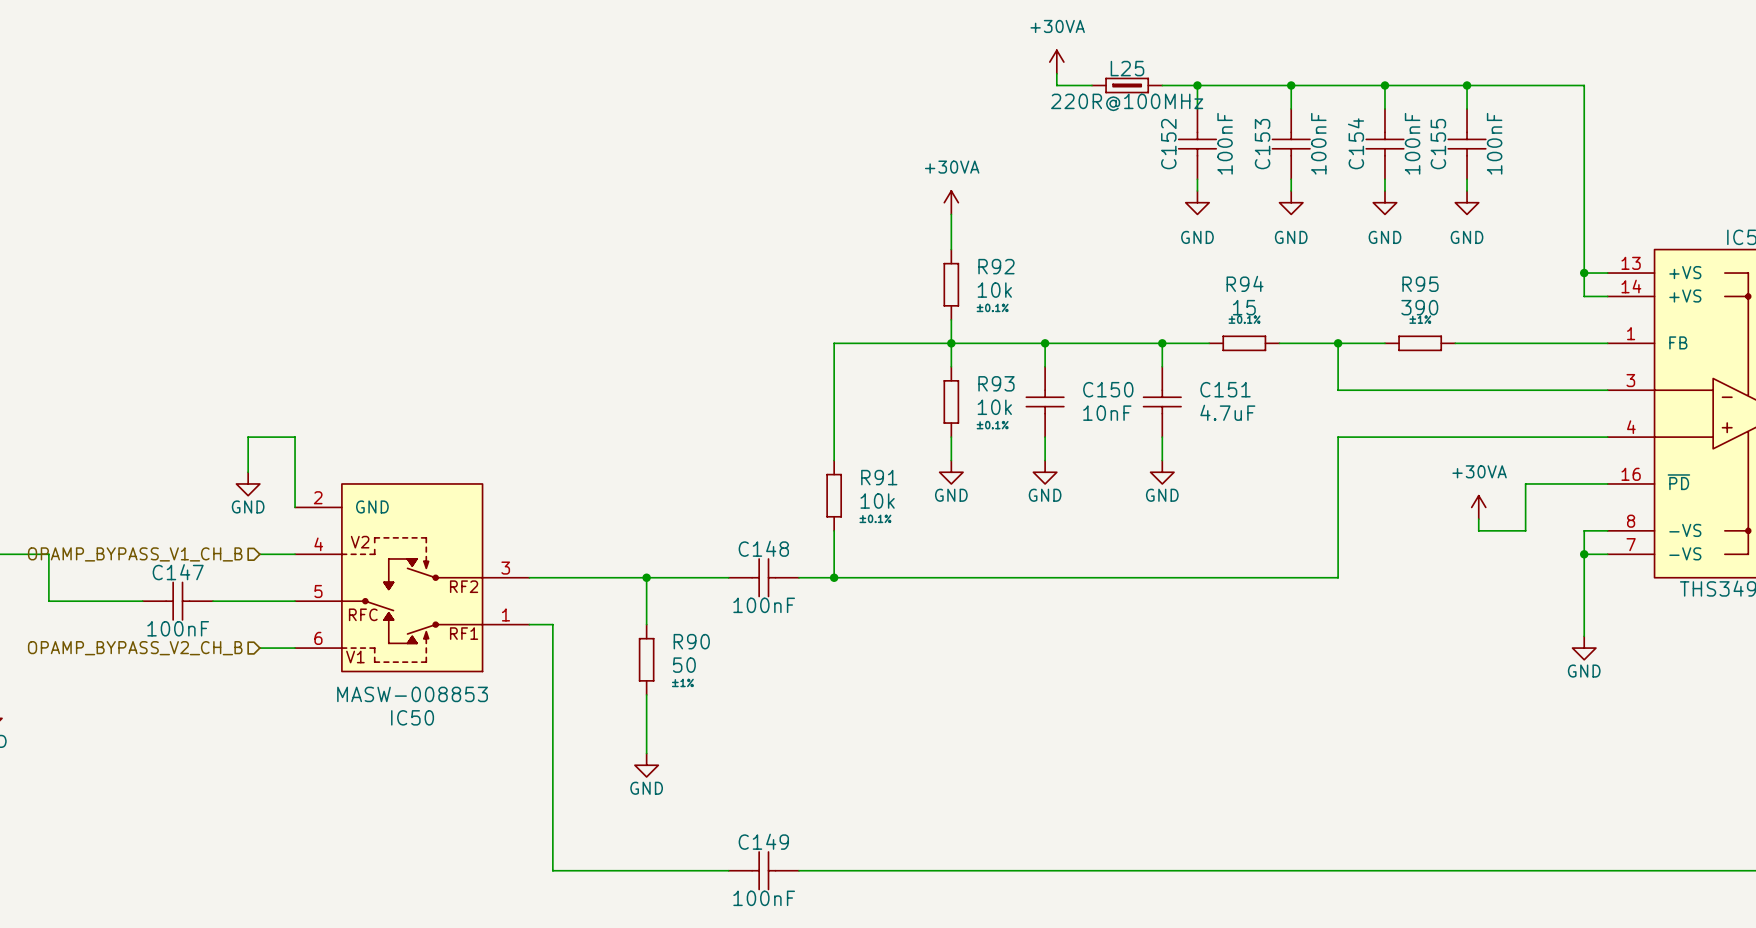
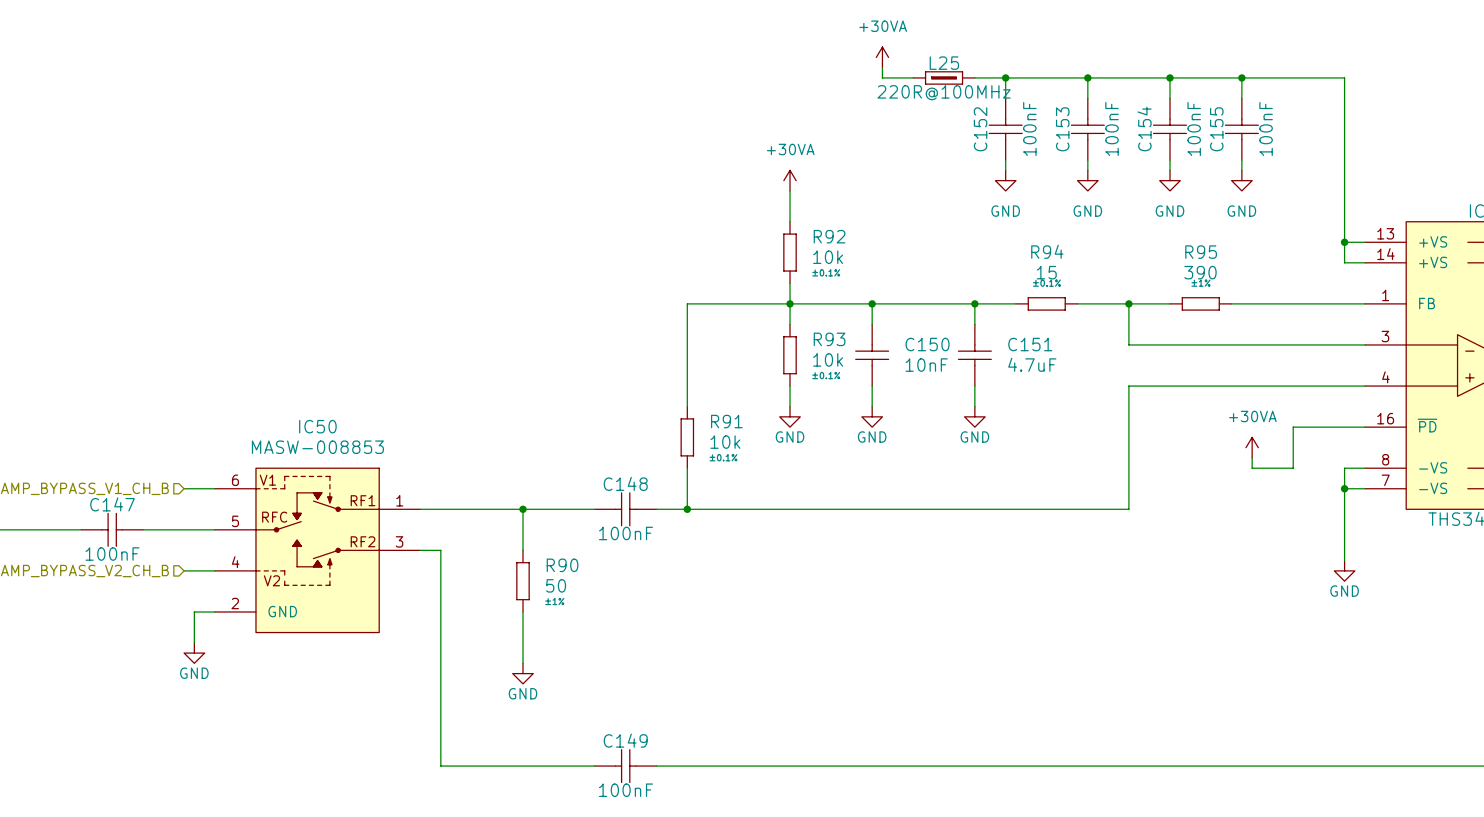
wire: (248, 472) (248, 437) (295, 437) (295, 507) -> none
power symbol: GND (248, 483) -> none
IC50 flip: as is (412, 577) -> up-down (317, 550)
wire: none -> (214, 611) (194, 611) (194, 642)
power symbol: none -> GND (194, 653)

